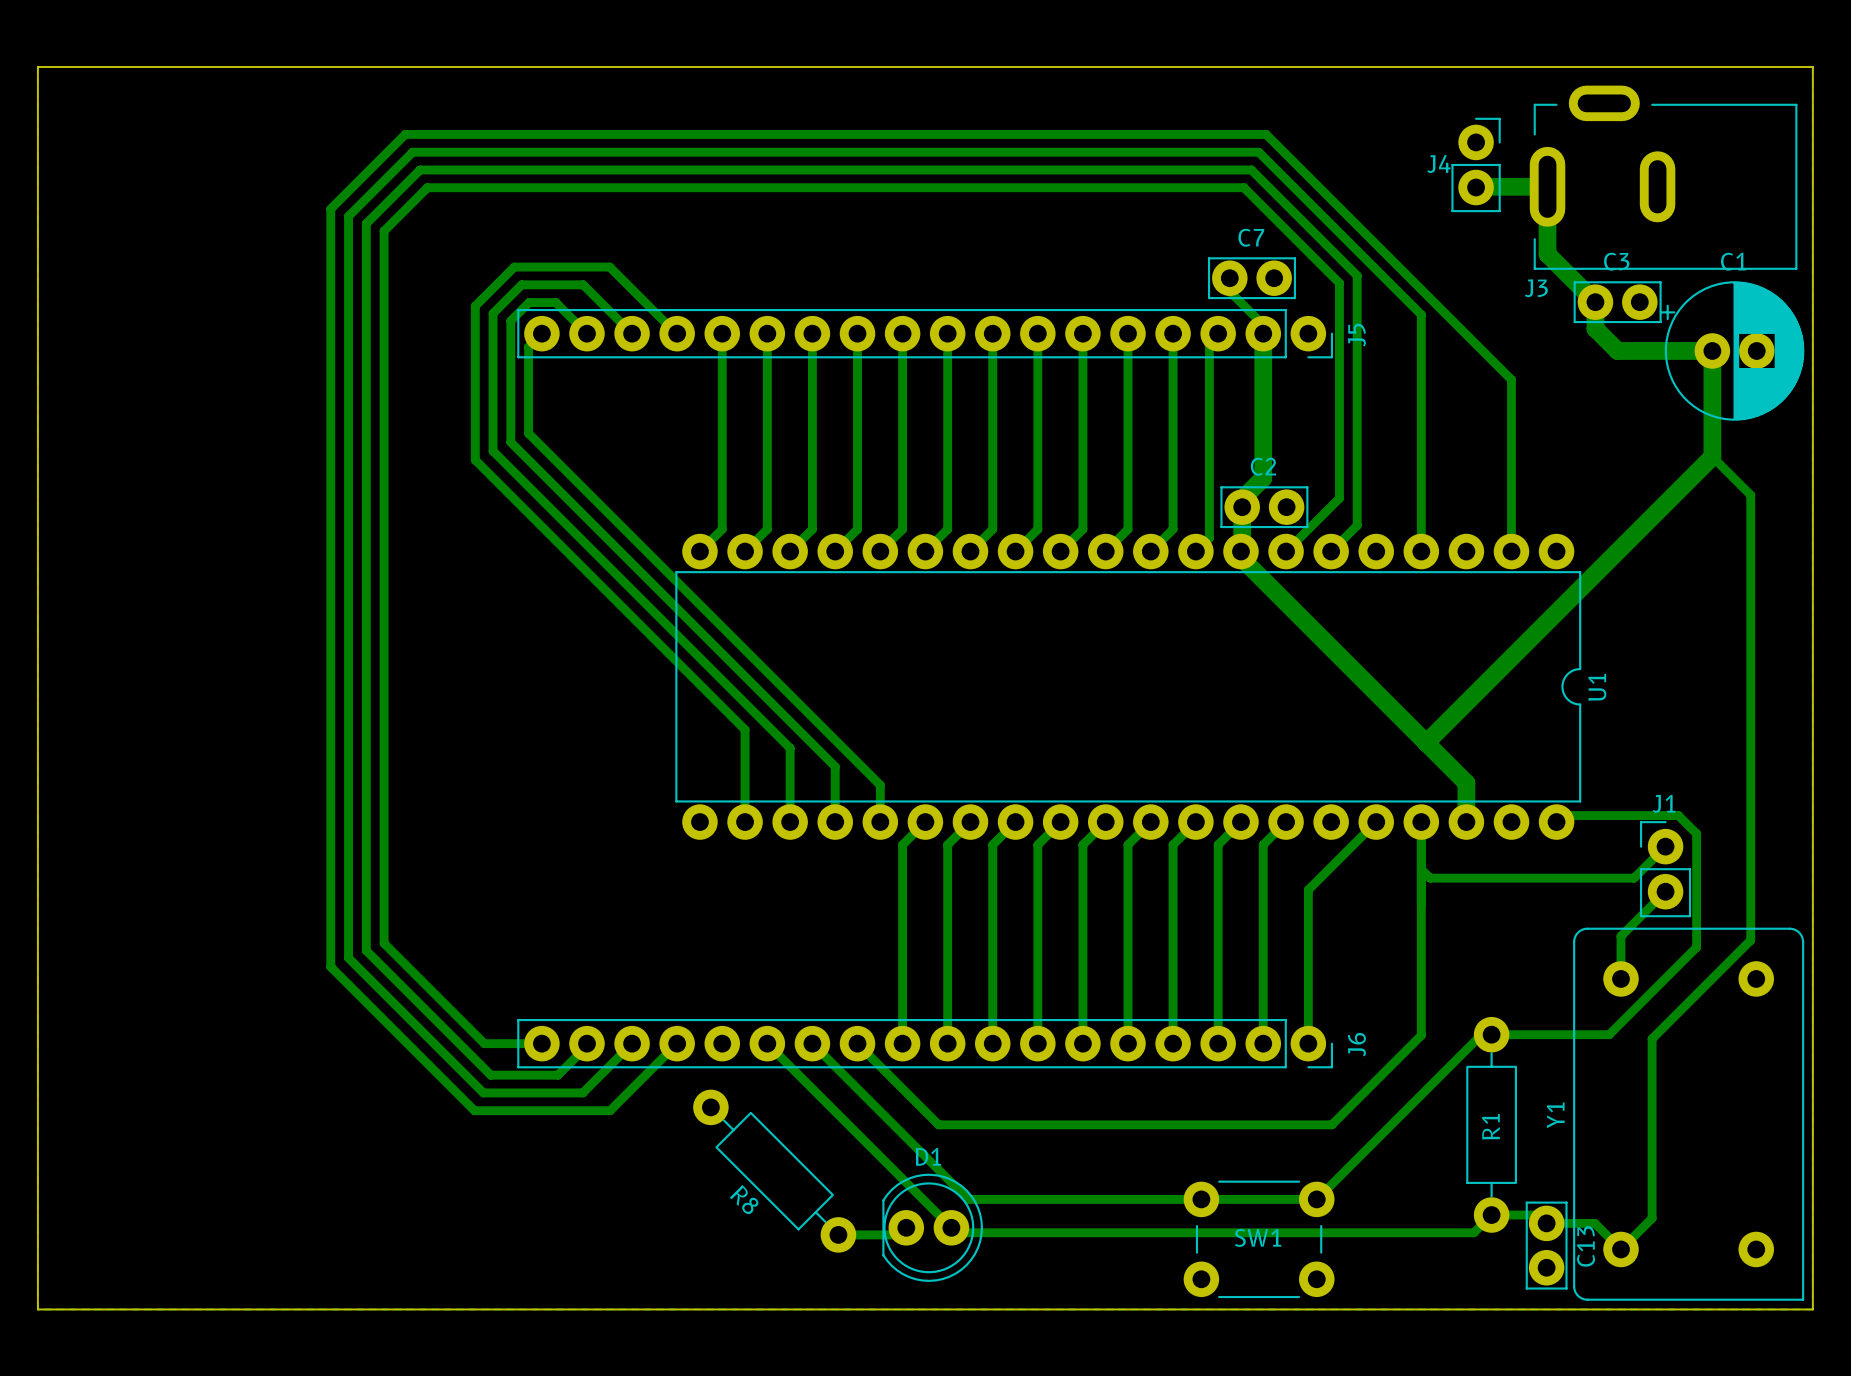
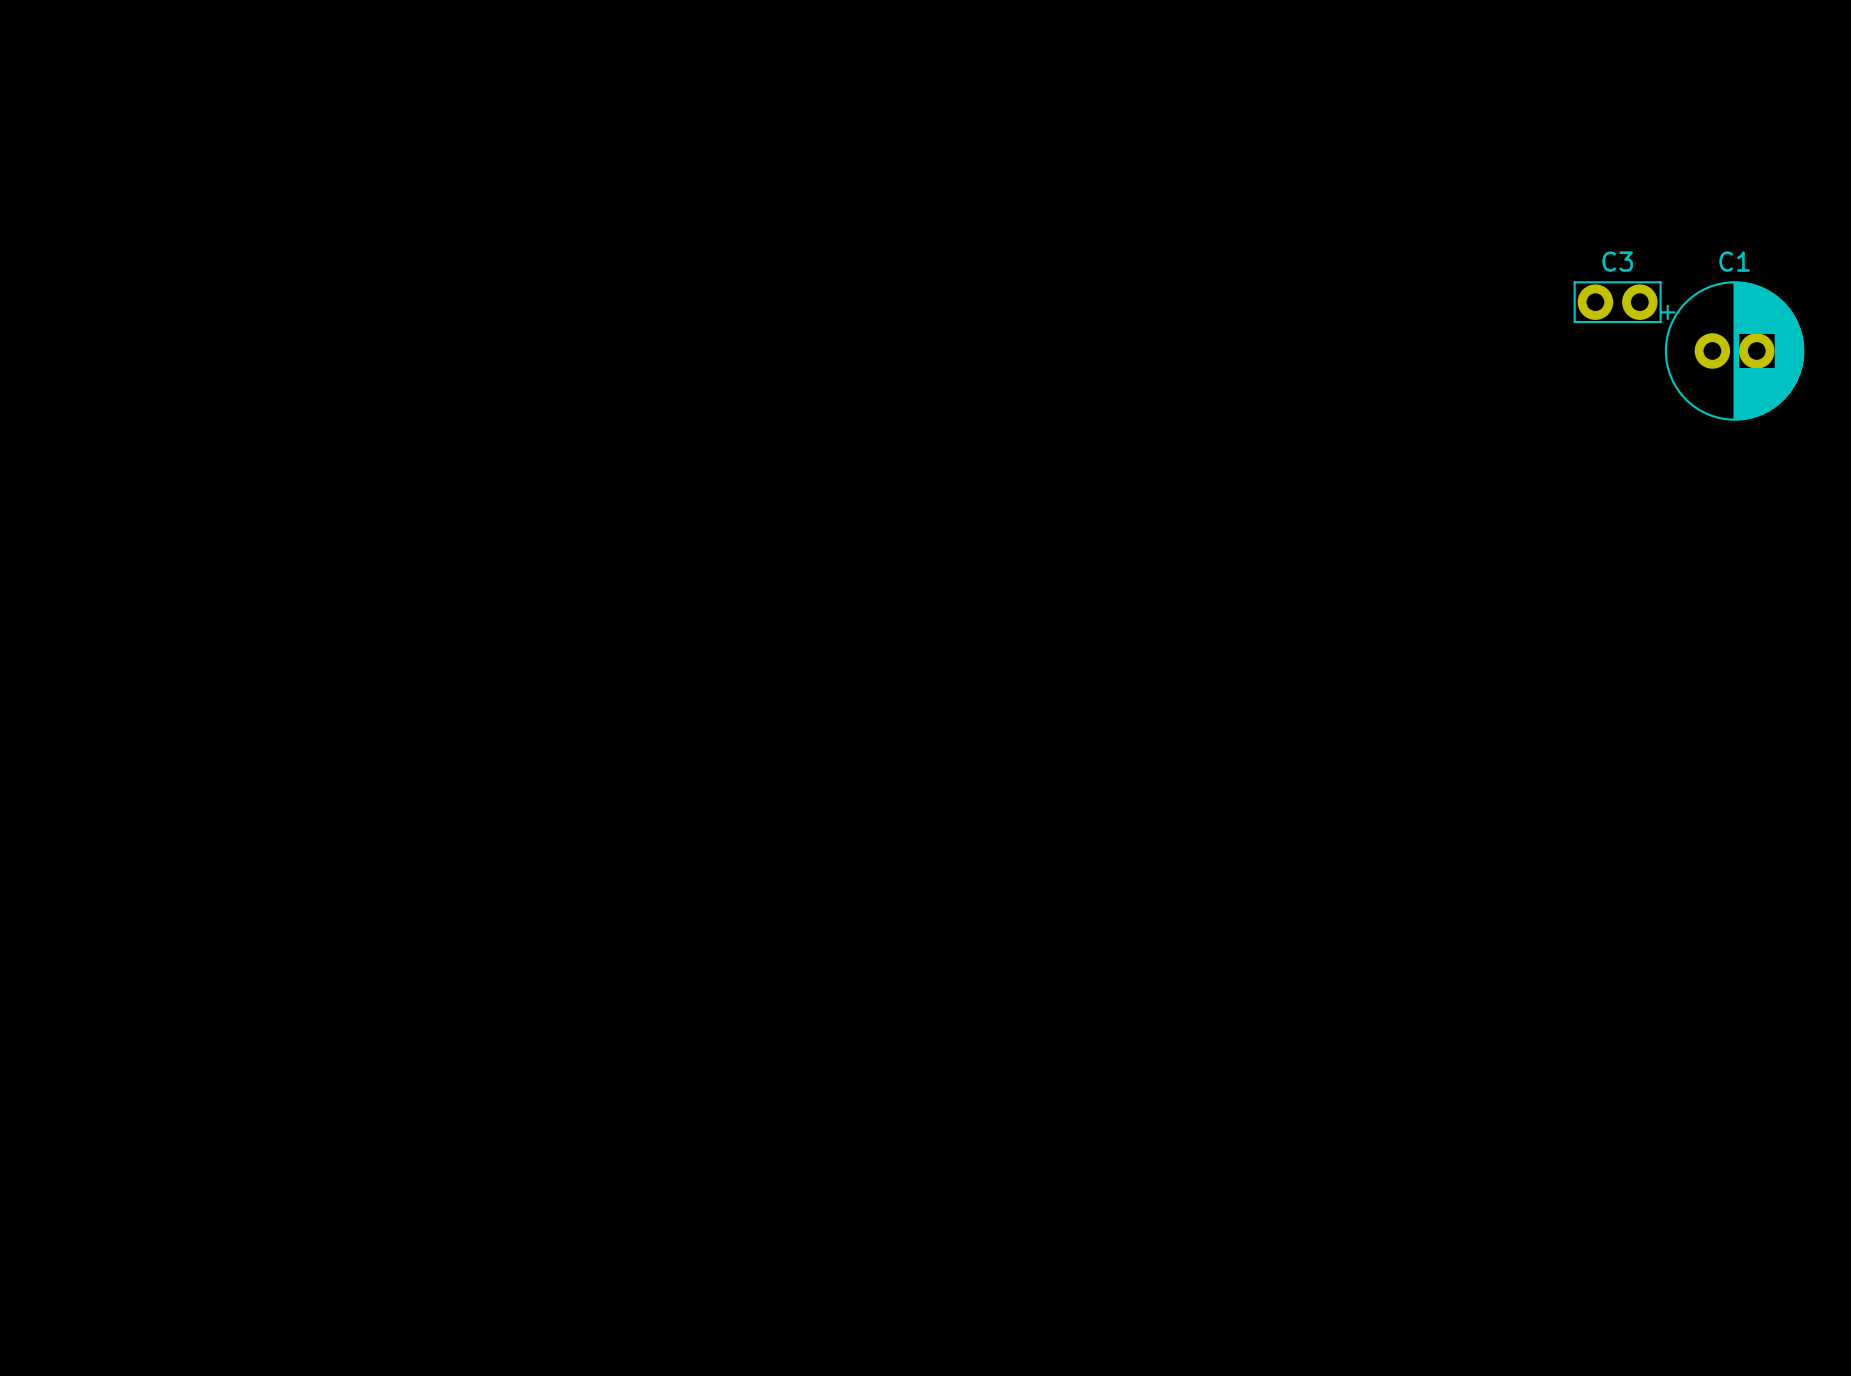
board edge: (37, 66) (1812, 66) (1812, 1309) (37, 1309) (37, 66) -> none
J4: (1476, 164) -> none
J3: (1663, 177) -> none
bottom track: (1476, 187) (1547, 186) (1547, 254) (1595, 302) (1595, 328) (1617, 350) (1712, 350) (1712, 456) -> none
bottom track: (1229, 278) (1229, 291) (1263, 324) (1263, 478) (1242, 499) (1240, 557) (1466, 783) (1466, 822) -> none
C7: (1251, 278) -> none
bottom track: (541, 333) (528, 346) (528, 433) (880, 785) (880, 822) -> none
bottom track: (587, 333) (555, 302) (529, 302) (510, 320) (510, 442) (835, 766) (835, 822) -> none
bottom track: (632, 333) (583, 284) (521, 284) (493, 313) (493, 451) (790, 748) (790, 822) -> none
bottom track: (677, 333) (609, 267) (514, 267) (475, 306) (475, 460) (745, 729) (745, 822) -> none
bottom track: (722, 333) (722, 529) (699, 551) -> none
bottom track: (767, 333) (767, 529) (745, 551) -> none
bottom track: (812, 333) (812, 529) (790, 551) -> none
bottom track: (857, 333) (857, 529) (835, 551) -> none
bottom track: (902, 333) (902, 529) (880, 551) -> none
J5: (925, 333) -> none
bottom track: (947, 333) (947, 529) (925, 551) -> none
bottom track: (992, 333) (992, 529) (970, 551) -> none
bottom track: (1037, 333) (1037, 529) (1015, 551) -> none
bottom track: (1082, 333) (1082, 529) (1060, 551) -> none
bottom track: (1128, 333) (1128, 529) (1105, 551) -> none
bottom track: (1173, 333) (1173, 529) (1150, 551) -> none
bottom track: (1218, 333) (1209, 342) (1209, 538) (1195, 551) -> none
bottom track: (1712, 456) (1426, 742) -> none
bottom track: (1712, 456) (1750, 495) (1750, 940) (1652, 1038) (1652, 1218) (1621, 1249) (1594, 1223) (1546, 1223) (1538, 1215) (1491, 1215) (1473, 1232) (956, 1232) (767, 1043) -> none
C2: (1264, 507) -> none
bottom track: (1286, 551) (1339, 498) (1339, 283) (1244, 187) (427, 187) (384, 231) (384, 943) (484, 1043) (541, 1043) -> none
bottom track: (1331, 551) (1357, 525) (1357, 275) (1251, 169) (420, 169) (366, 223) (366, 950) (490, 1075) (557, 1075) (587, 1046) (587, 1043) -> none
bottom track: (1421, 551) (1421, 314) (1258, 152) (412, 152) (348, 216) (348, 958) (483, 1092) (582, 1092) (632, 1043) -> none
bottom track: (1511, 551) (1511, 379) (1266, 134) (405, 134) (330, 208) (330, 966) (474, 1110) (610, 1110) (677, 1043) -> none
U1: (1128, 686) -> none
bottom track: (925, 822) (902, 844) (902, 1043) -> none
bottom track: (970, 822) (947, 844) (947, 1043) -> none
bottom track: (1015, 822) (992, 844) (992, 1043) -> none
bottom track: (1060, 822) (1037, 844) (1037, 1043) -> none
bottom track: (1105, 822) (1082, 844) (1082, 1043) -> none
bottom track: (1150, 822) (1128, 844) (1128, 1043) -> none
bottom track: (1195, 822) (1173, 844) (1173, 1043) -> none
bottom track: (1240, 822) (1218, 844) (1218, 1043) -> none
bottom track: (1286, 822) (1263, 844) (1263, 1043) -> none
bottom track: (1376, 822) (1308, 889) (1308, 1043) -> none
bottom track: (1421, 822) (1421, 1035) (1331, 1124) (938, 1124) (857, 1043) -> none
bottom track: (1556, 822) (1563, 815) (1678, 815) (1696, 833) (1696, 947) (1609, 1034) (1481, 1034) (1316, 1199) (968, 1199) (812, 1043) -> none
bottom track: (1665, 846) (1634, 878) (1430, 878) (1421, 869) -> none
J1: (1665, 869) -> none
bottom track: (1665, 891) (1621, 936) (1621, 978) -> none
J6: (925, 1043) -> none
Y1: (1688, 1114) -> none
R1: (1491, 1124) -> none
R8: (774, 1171) -> none
bottom track: (906, 1227) (899, 1234) (838, 1234) -> none
D1: (932, 1227) -> none
SW1: (1259, 1239) -> none
C13: (1546, 1245) -> none

